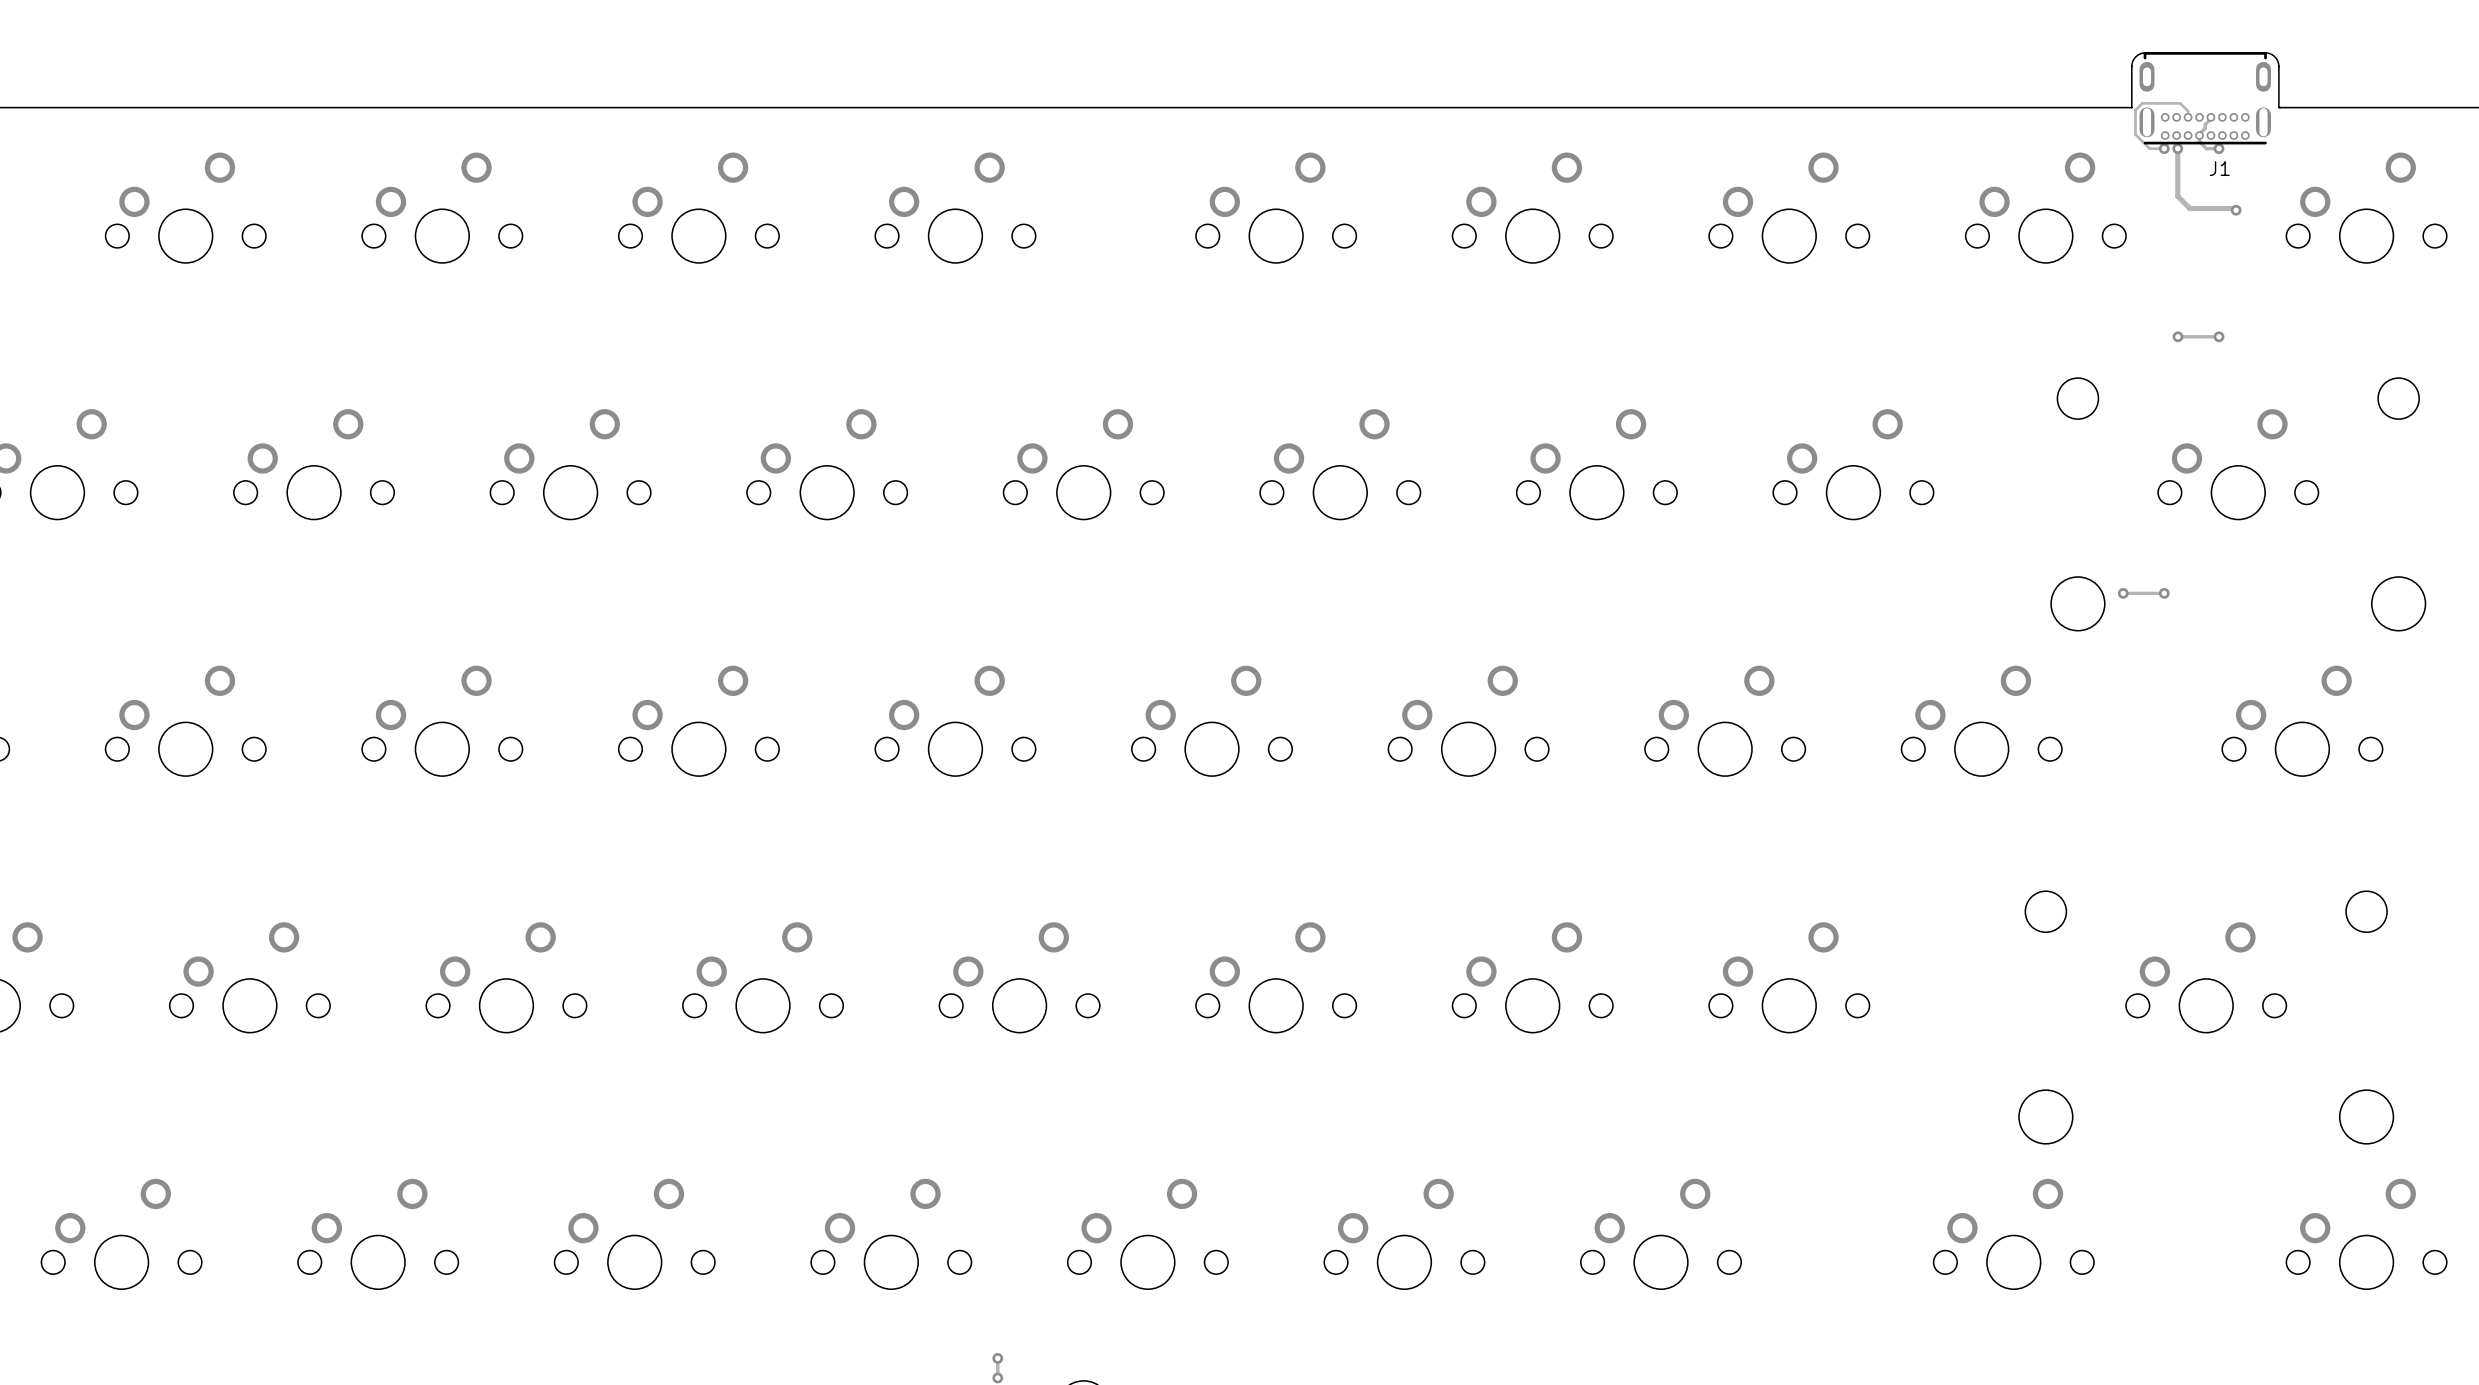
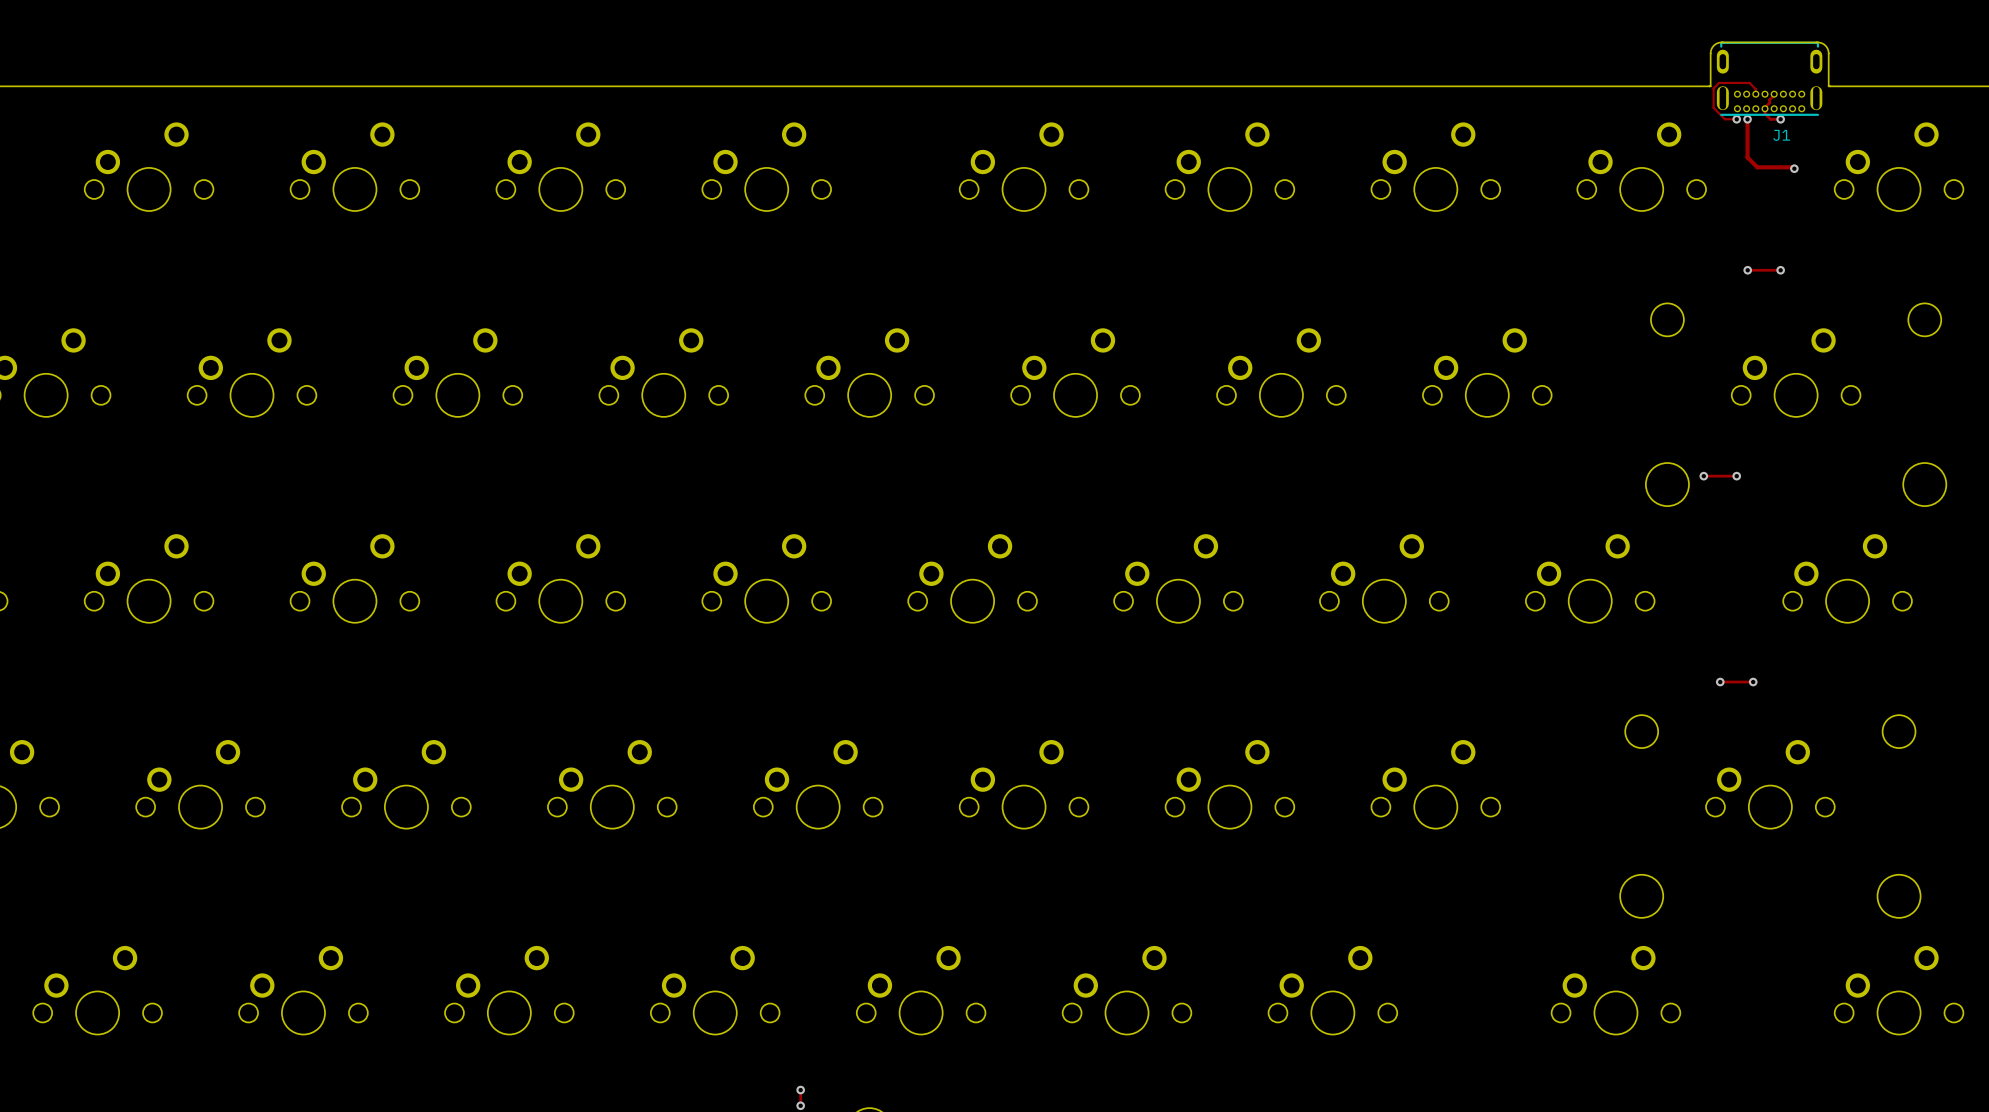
track: none -> (1720, 682) (1753, 682)
via: none -> (1720, 682)
via: none -> (1753, 682)

